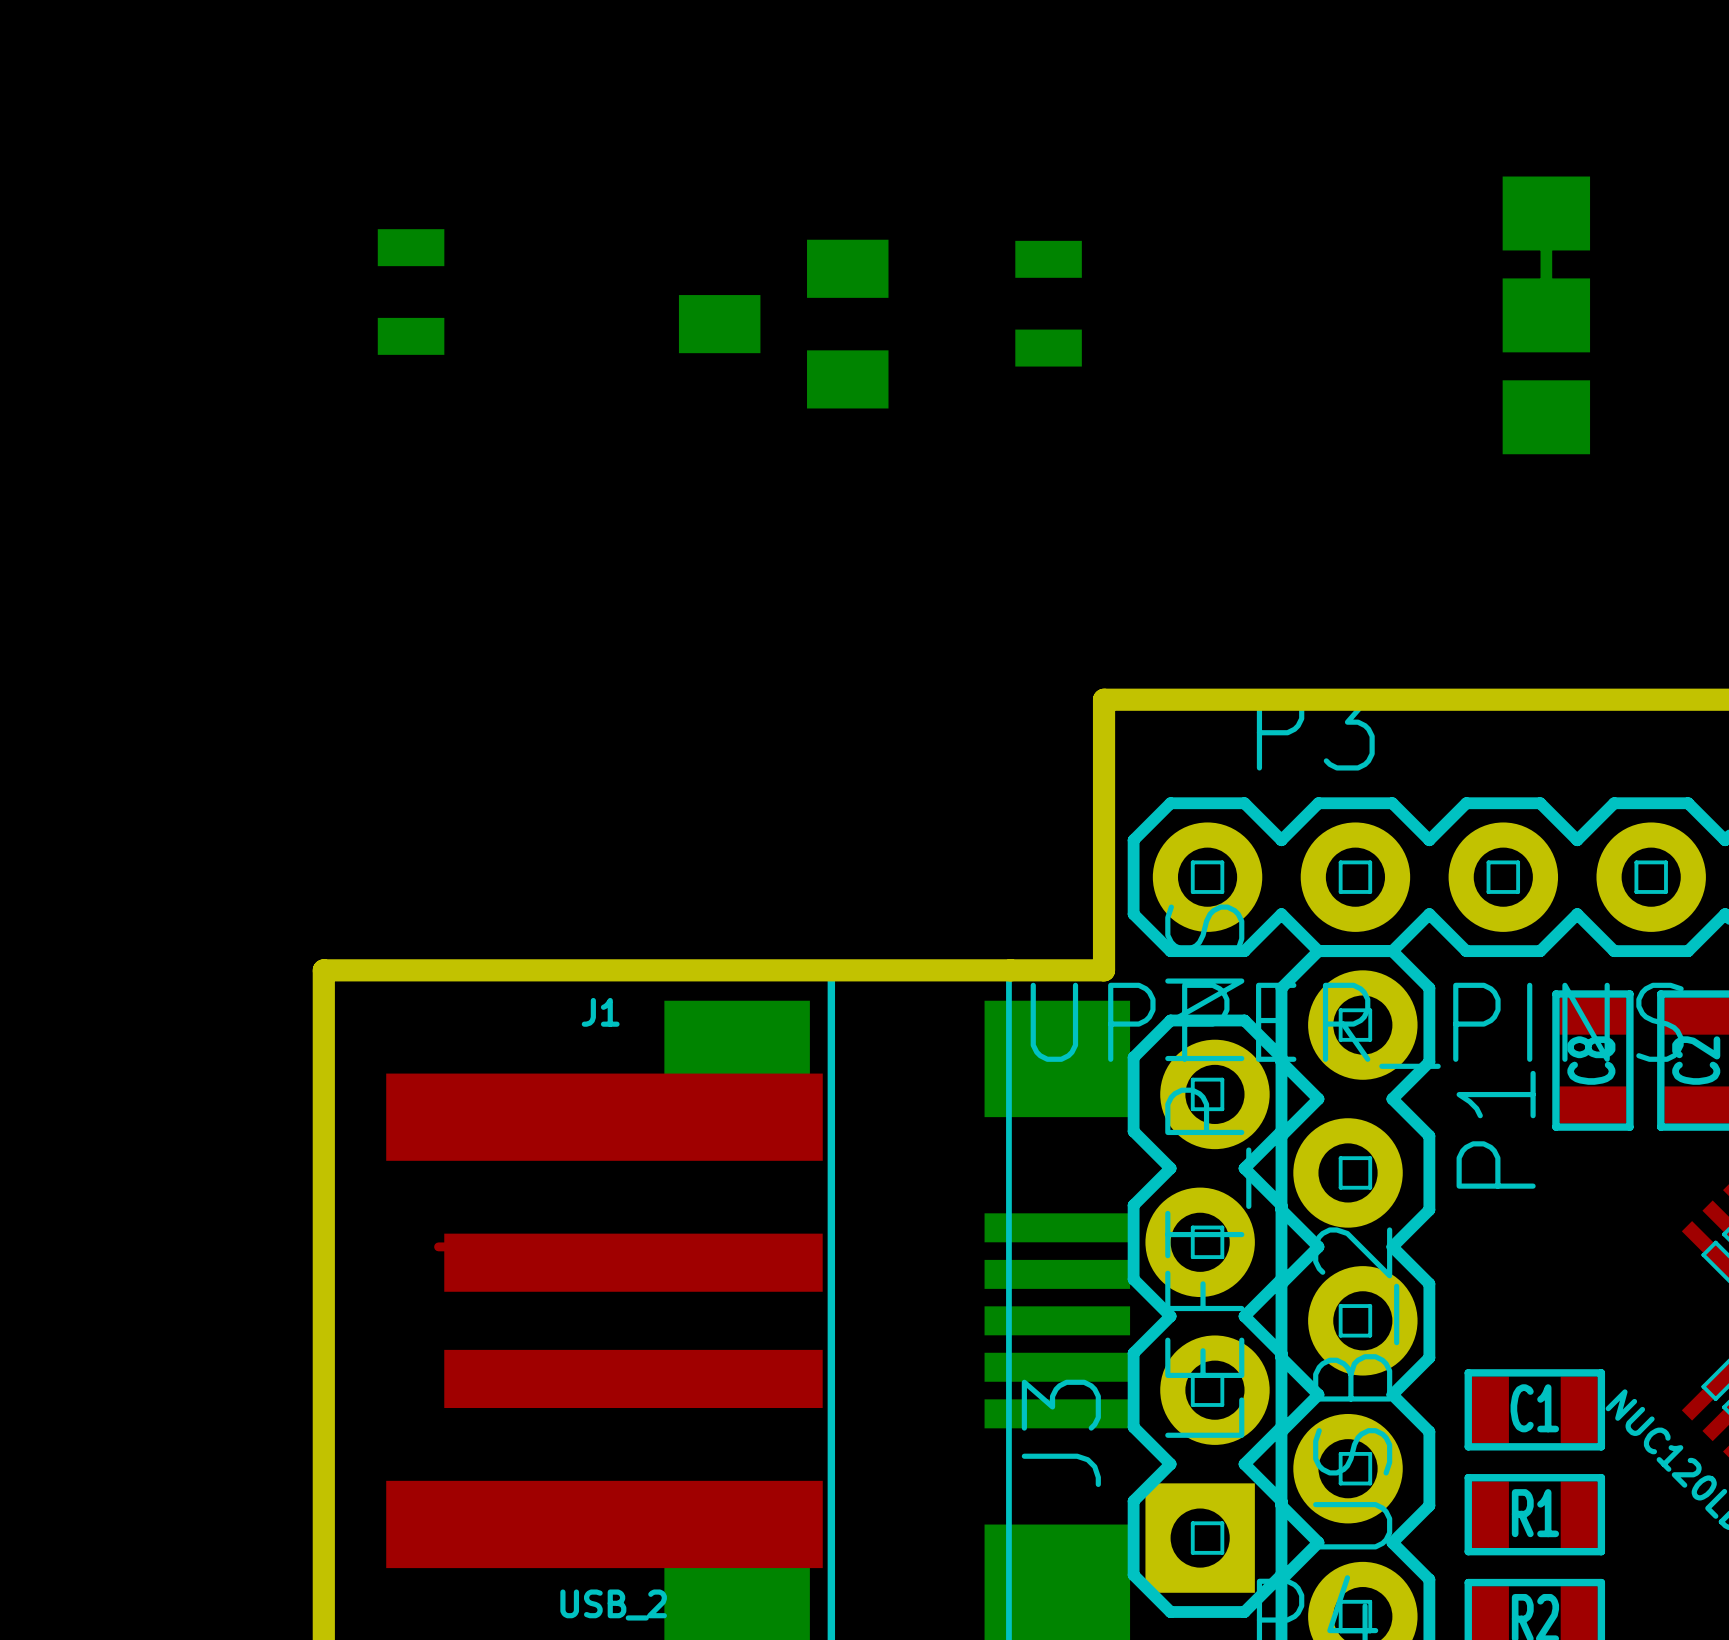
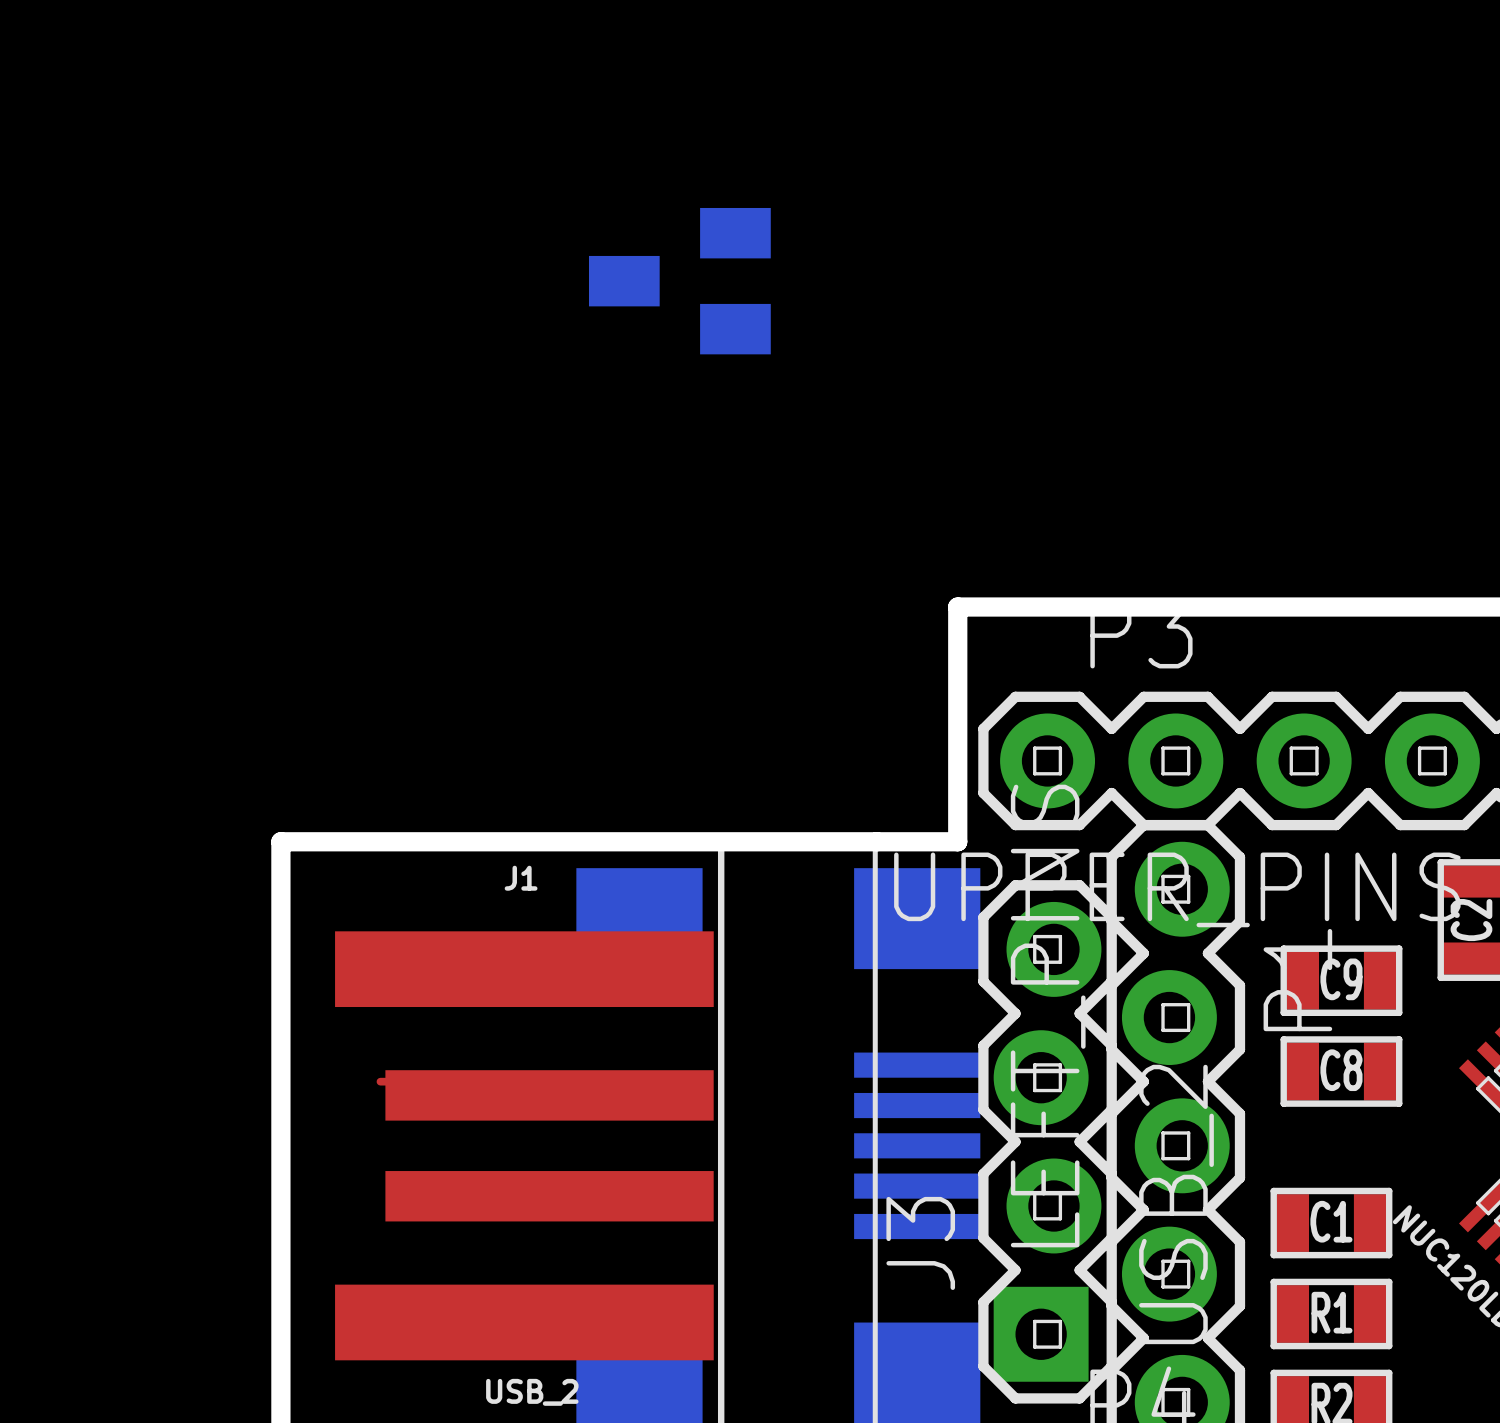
part: (411, 292) -> none
C9 side: bottom (1048, 303) -> top (1341, 980)
part: (1546, 315) -> none
C8 rotation: 0° (1592, 1060) -> 90° clockwise (1341, 1071)
C8 position: (1592, 1060) -> (1341, 1071)

